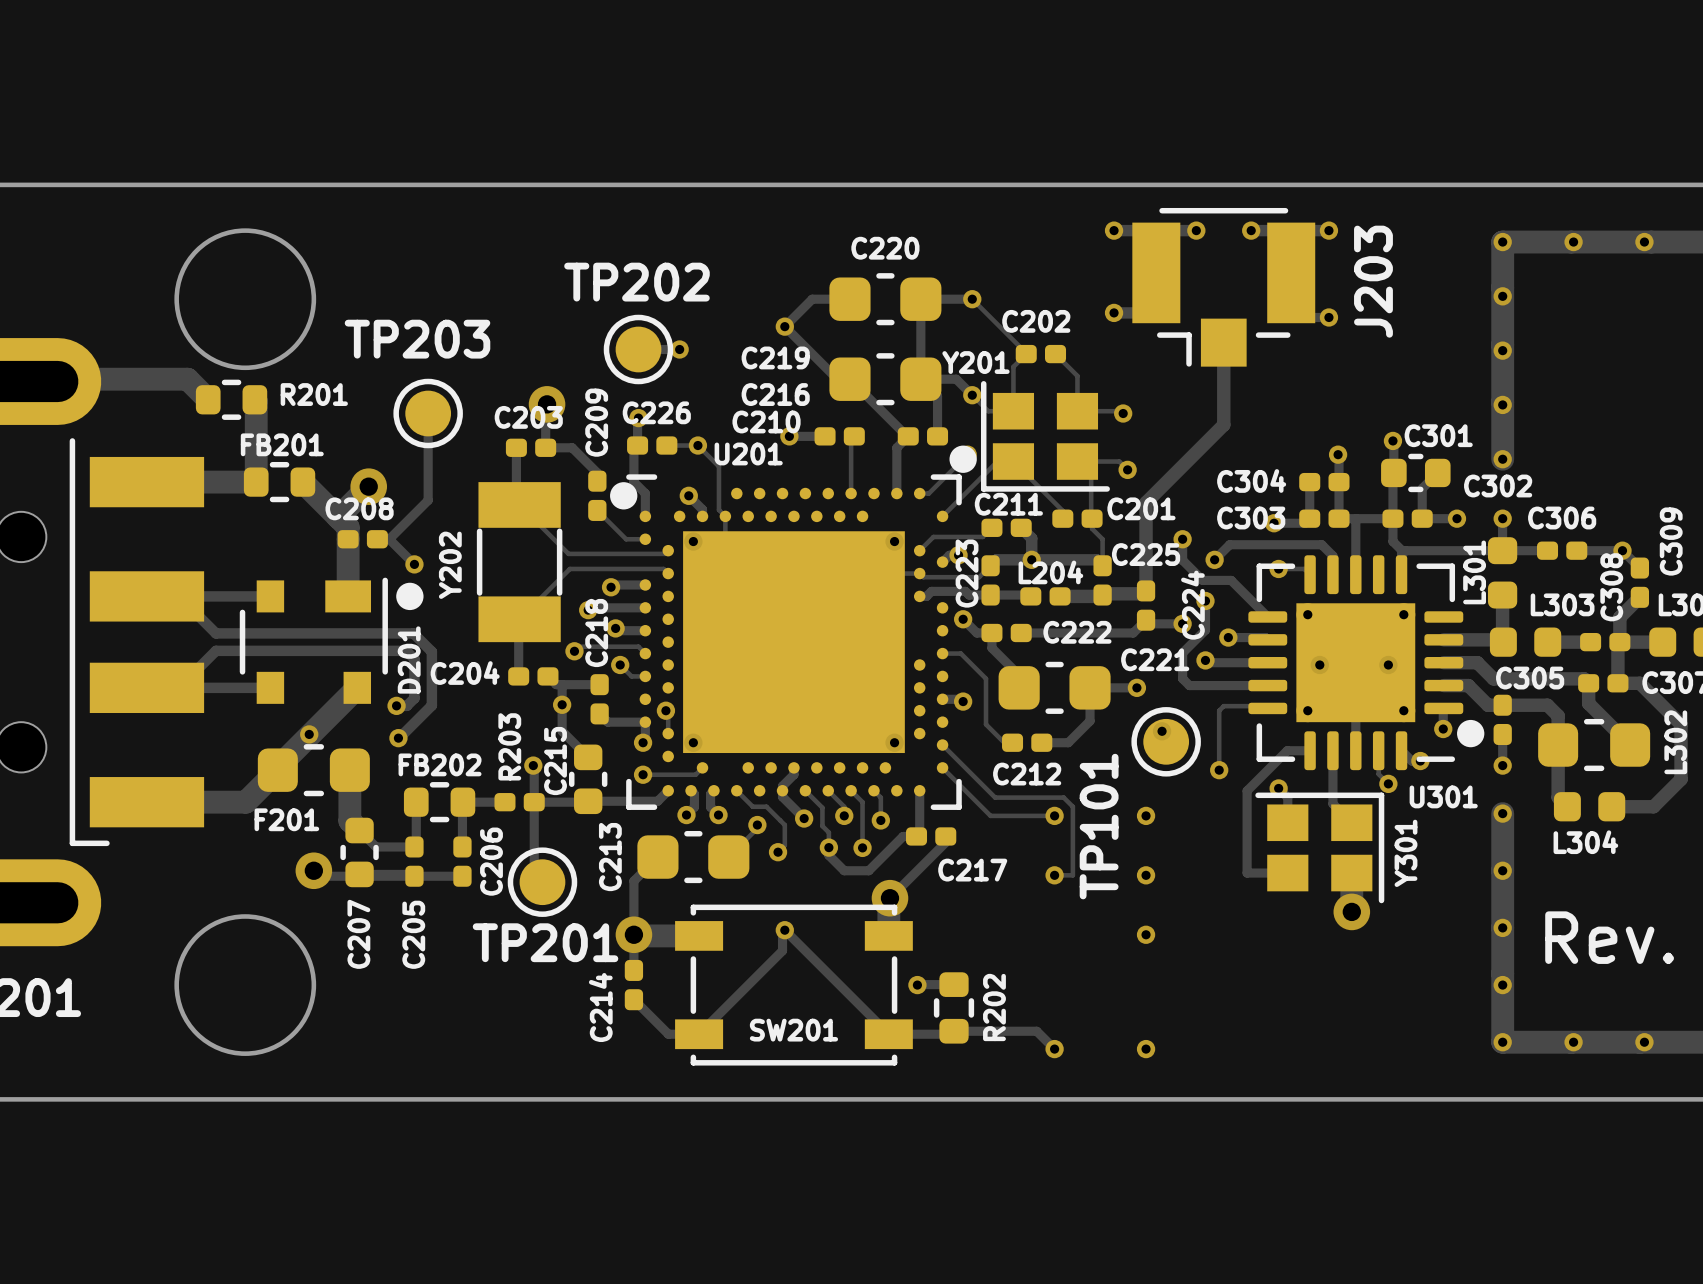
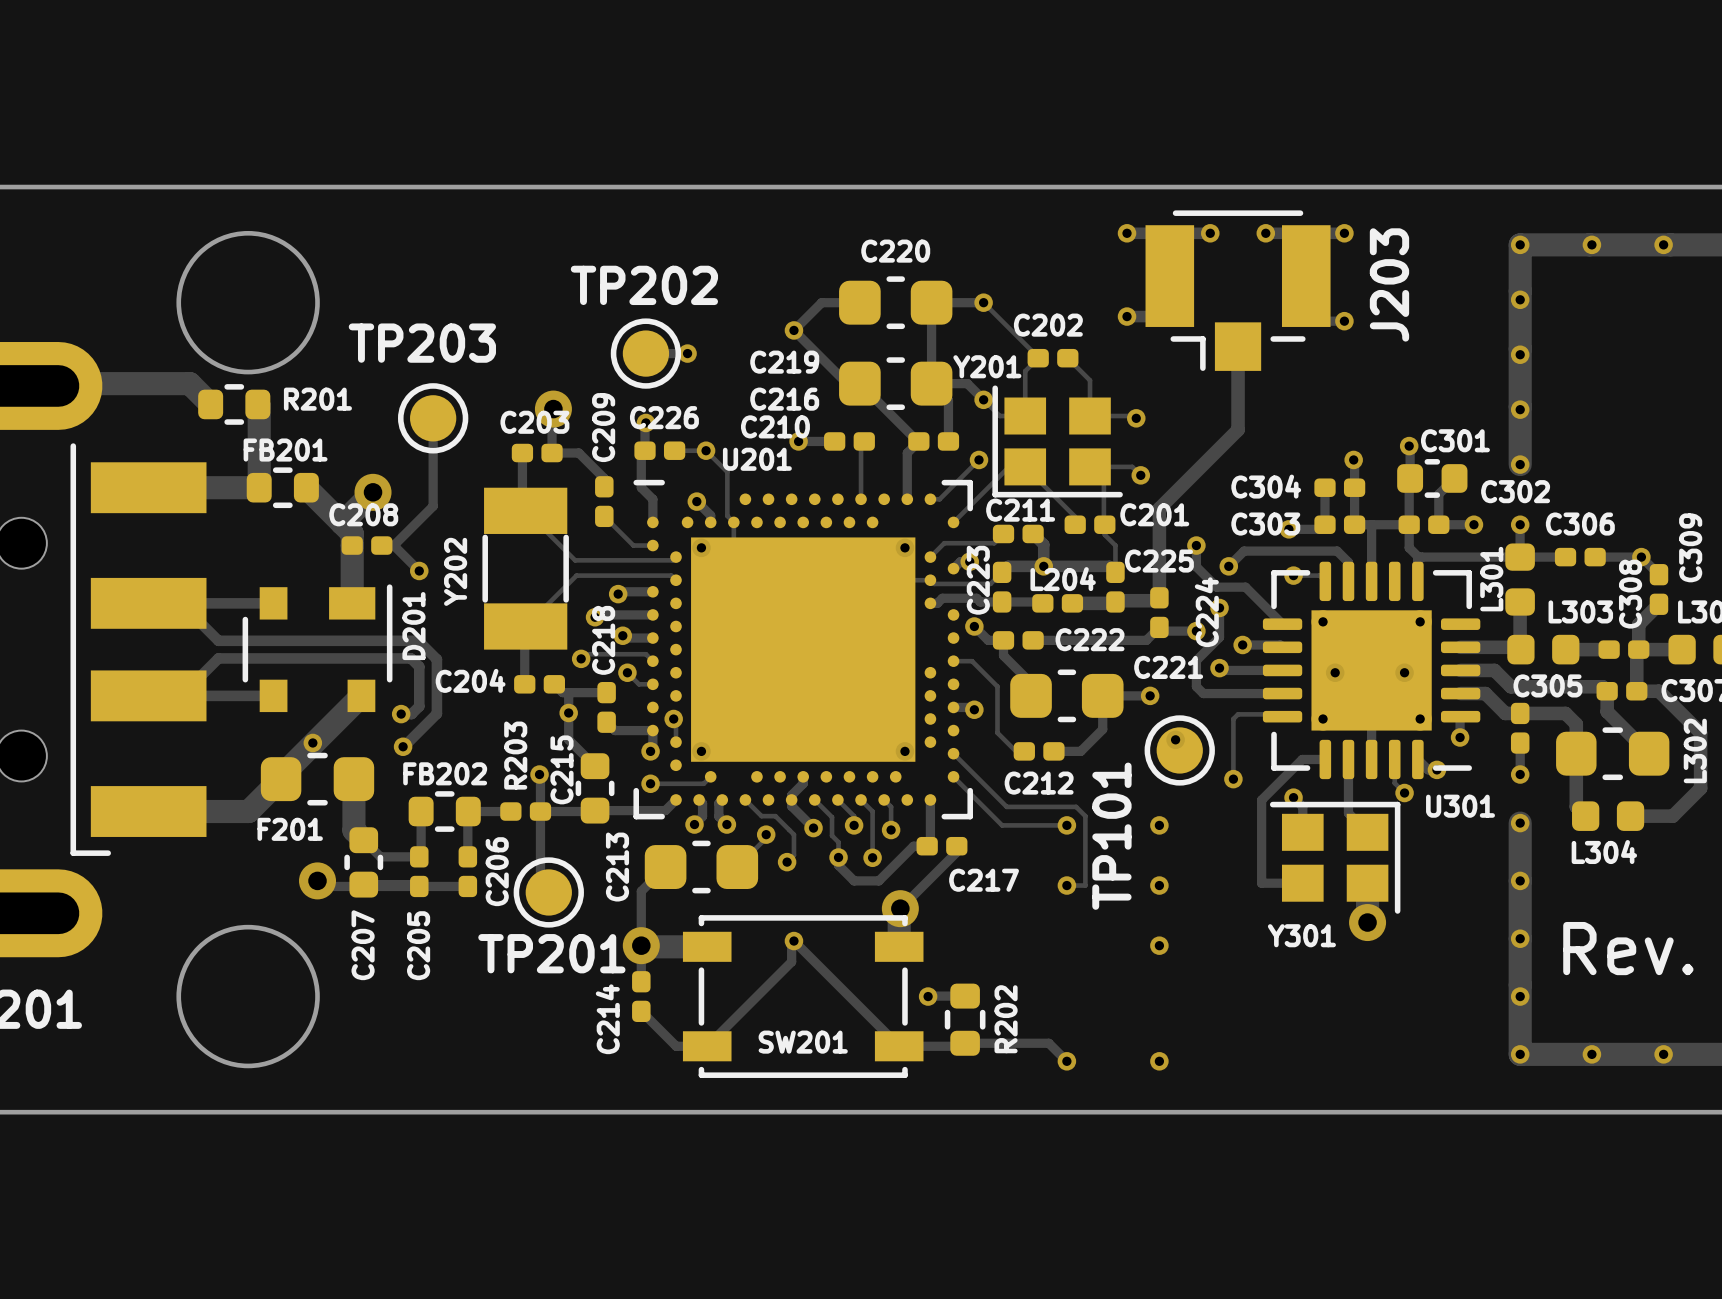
drawing: [949, 445, 977, 473] -> none
drawing: [610, 482, 638, 510] -> none
drawing: [396, 582, 424, 611] -> none
D201 name position: D201 (409, 659) -> D201 (413, 626)
drawing: [1457, 719, 1485, 748] -> none
Y301 name rotation: 0° (1405, 853) -> 90° clockwise (1301, 935)
Y301 name position: Y301 (1405, 853) -> Y301 (1301, 935)

